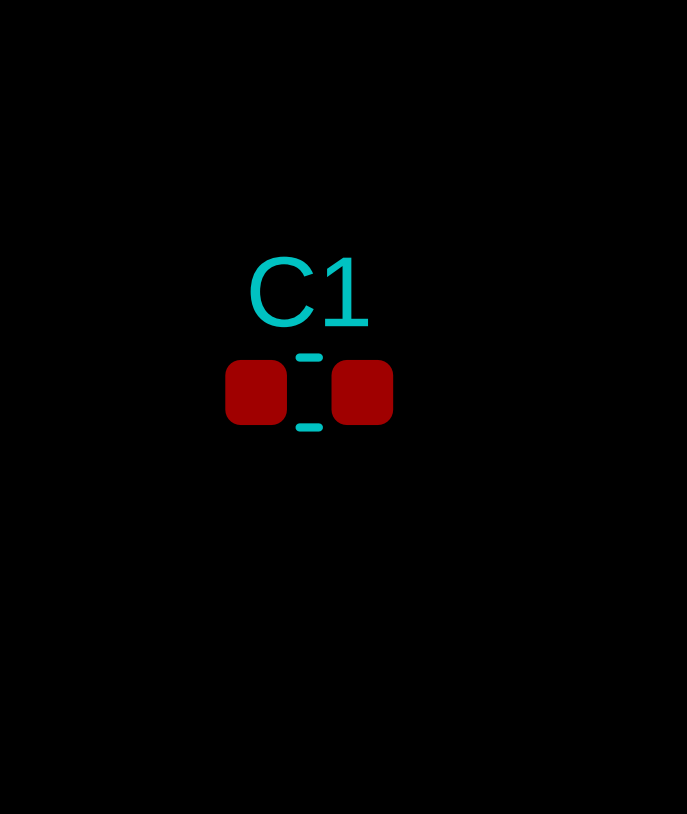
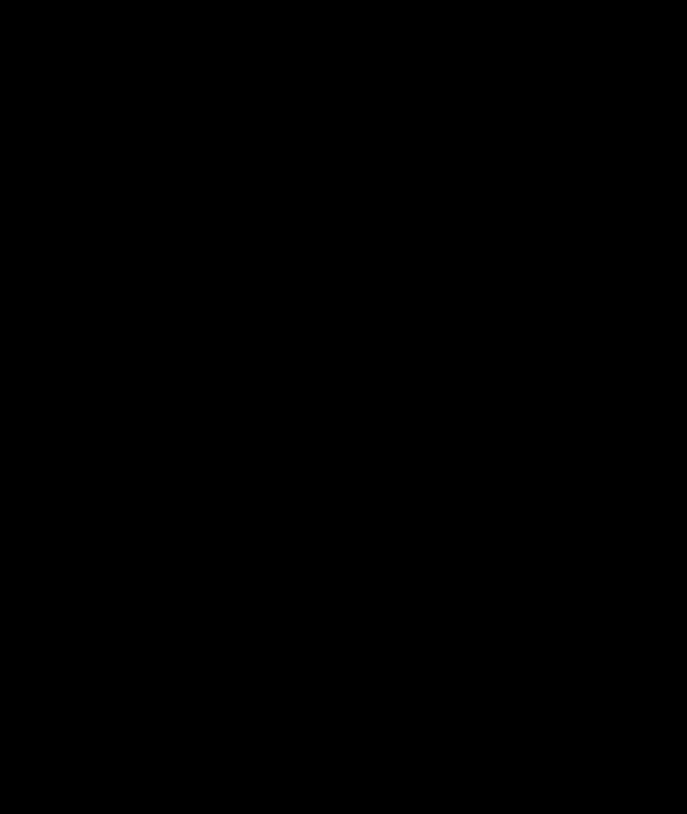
C1: (309, 392) -> none

